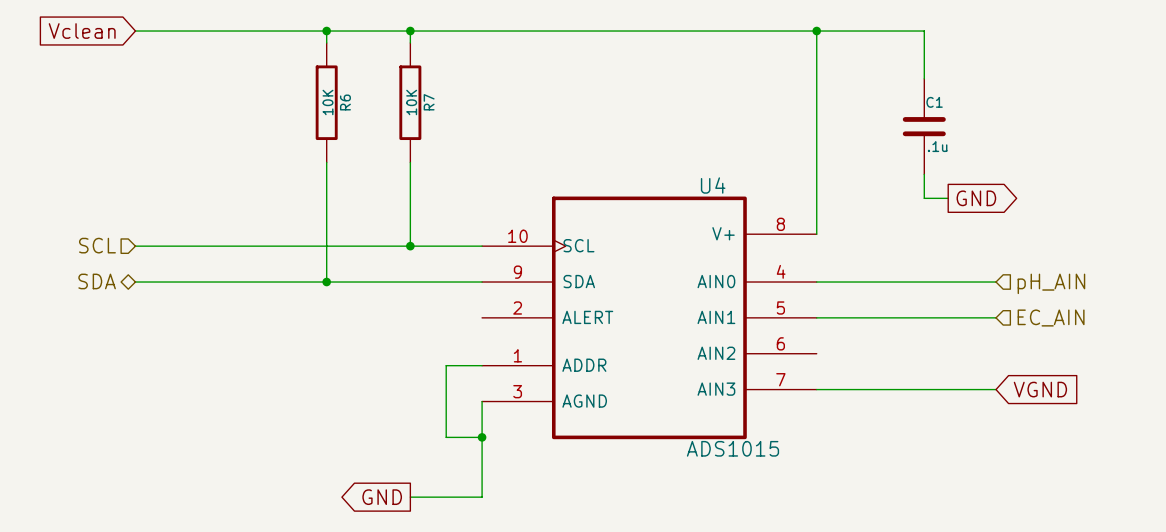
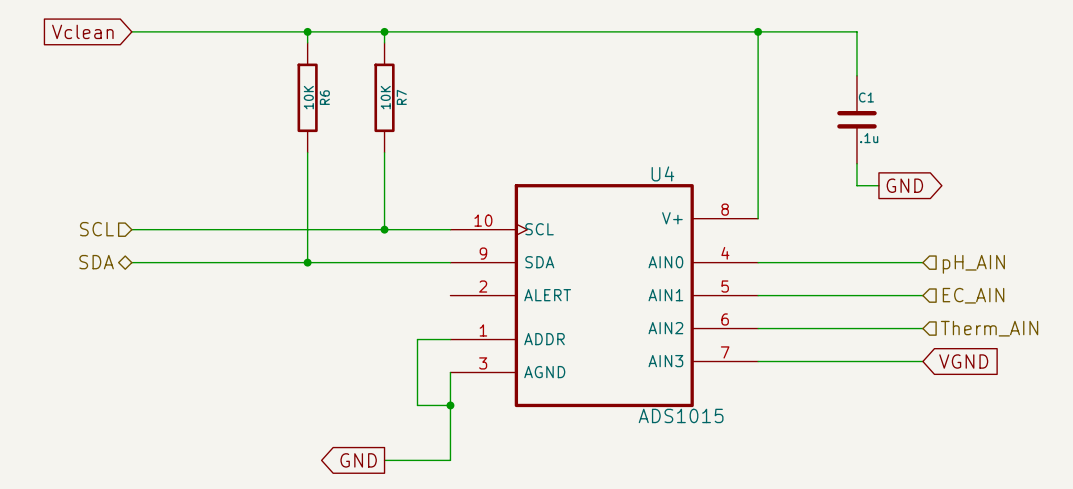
wire: none -> (758, 328) (922, 328)
hierarchical label: none -> Therm_AIN (989, 328)

